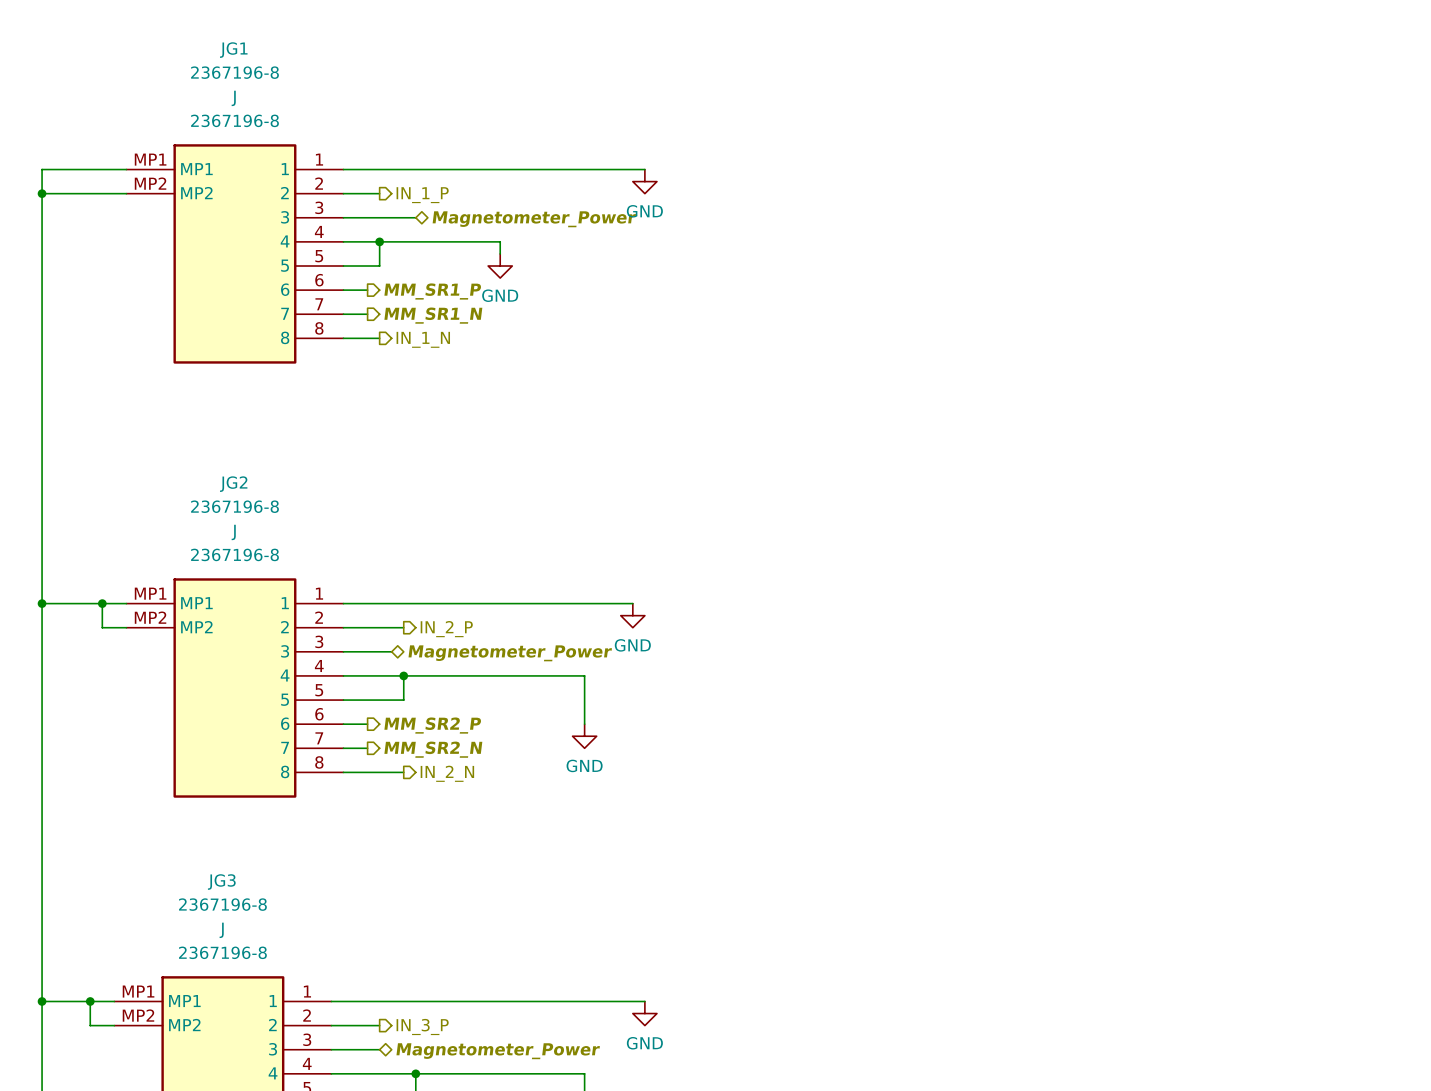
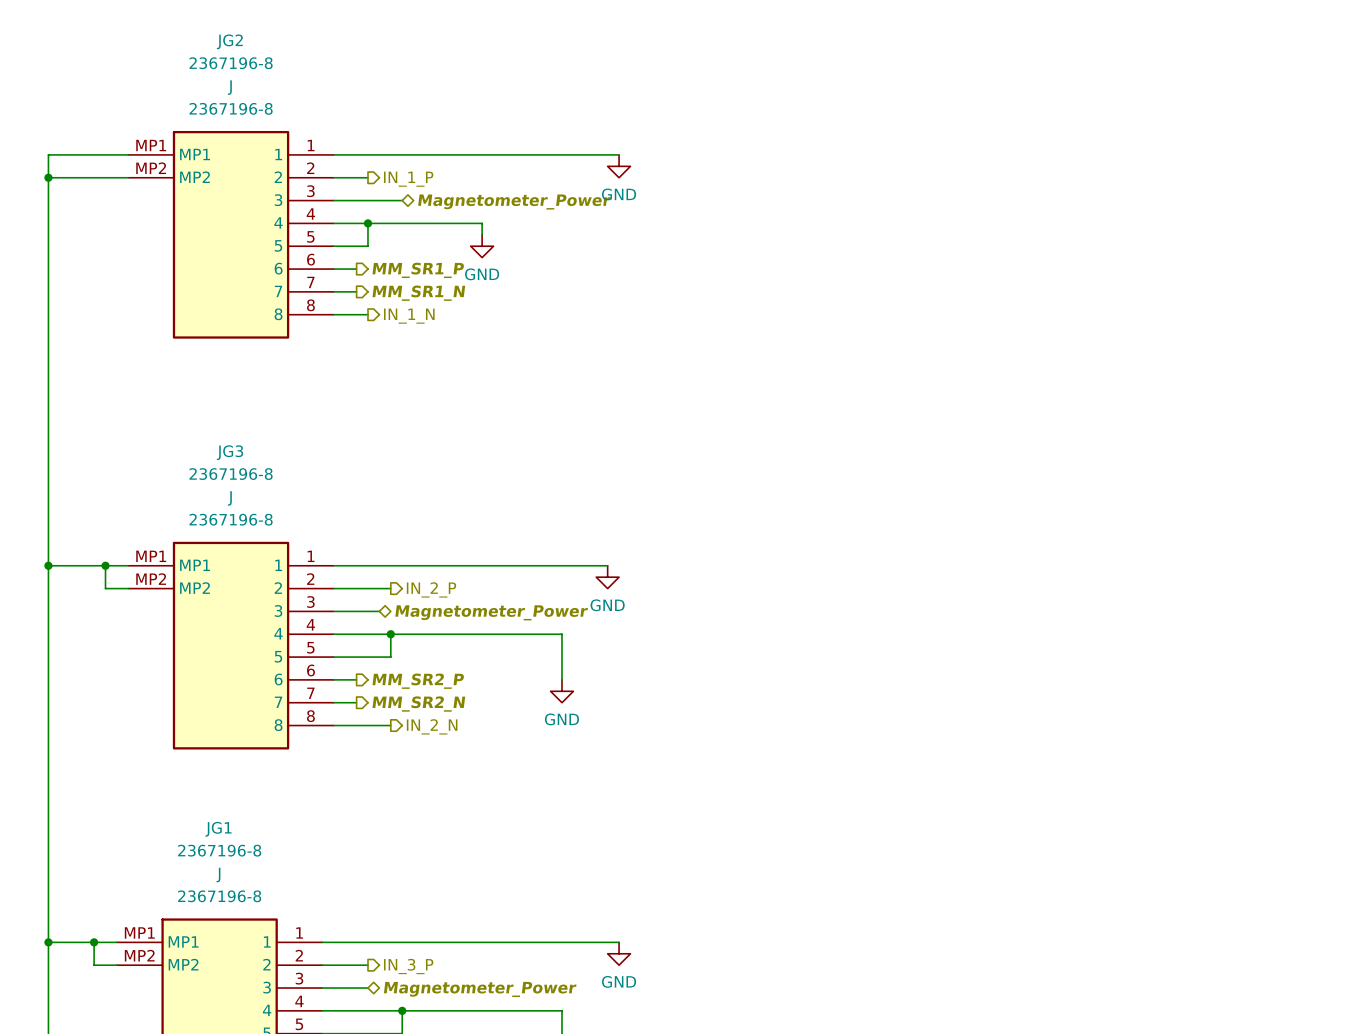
JG1 name: JG1 (233, 50) -> JG2 (229, 41)
JG2 name: JG2 (233, 484) -> JG3 (230, 452)
JG3 name: JG3 (221, 882) -> JG1 (218, 829)

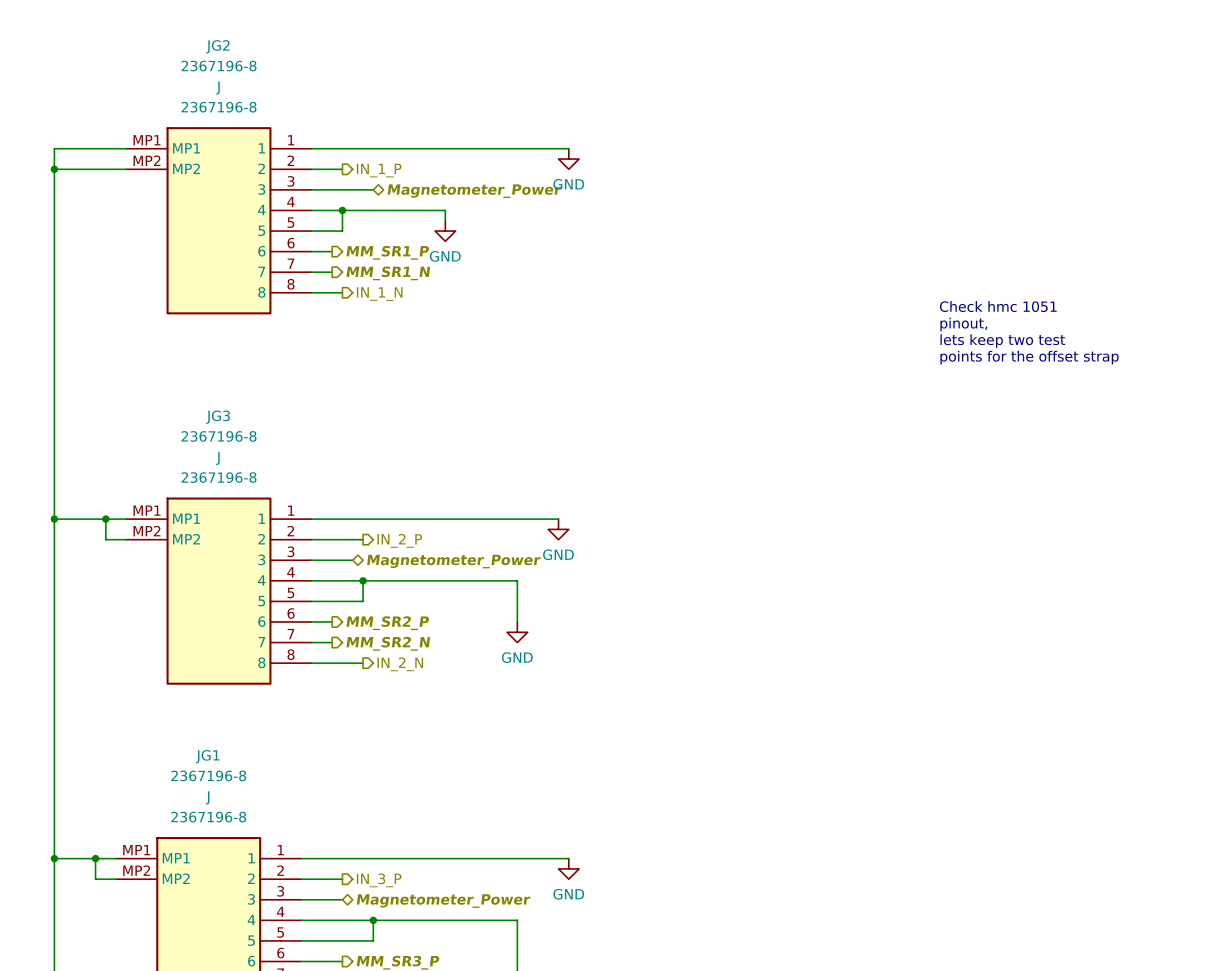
text: none -> Check hmc 1051 (998, 306)
text: none -> pinout, (963, 324)
text: none -> lets keep two test (1002, 341)
text: none -> points for the offset strap (1029, 357)

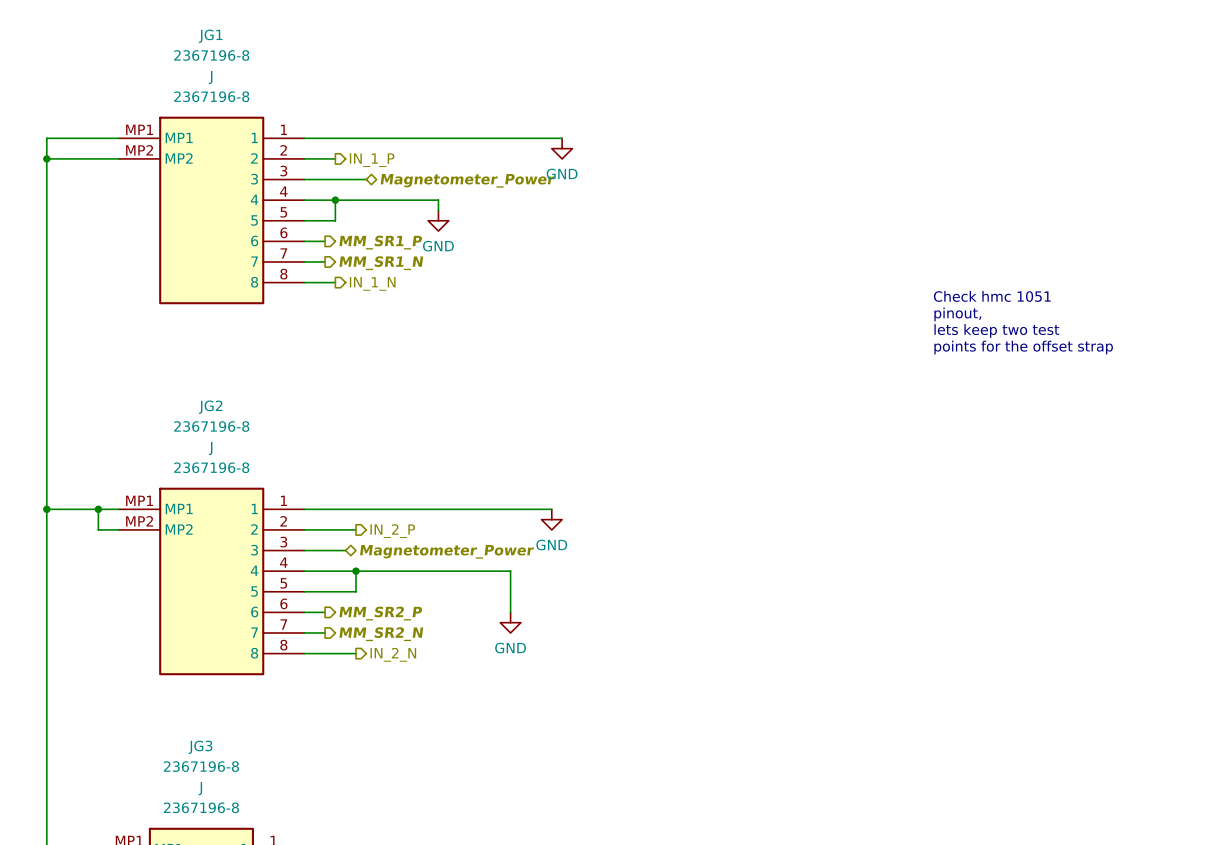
JG2 name: JG2 (217, 46) -> JG1 (210, 36)
JG3 name: JG3 (218, 417) -> JG2 (210, 407)
JG1 name: JG1 (207, 756) -> JG3 (200, 747)

